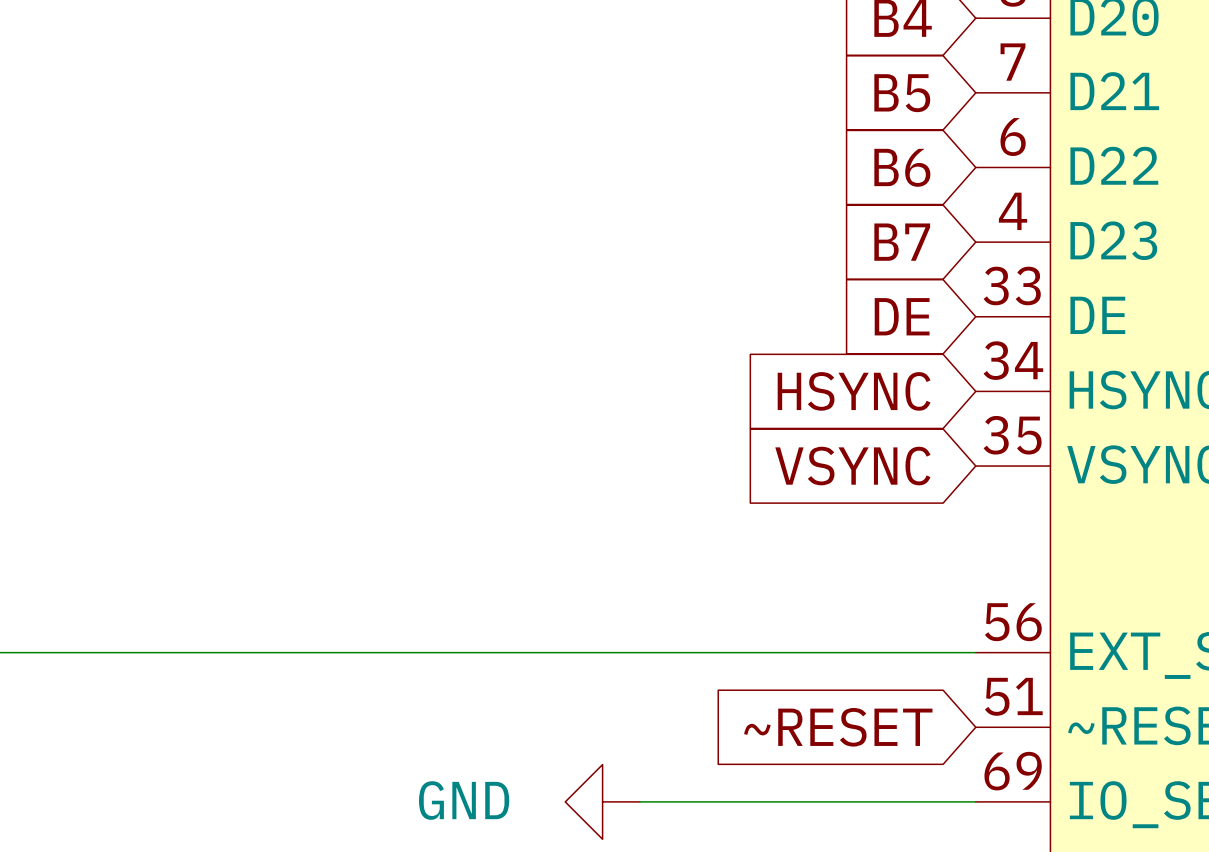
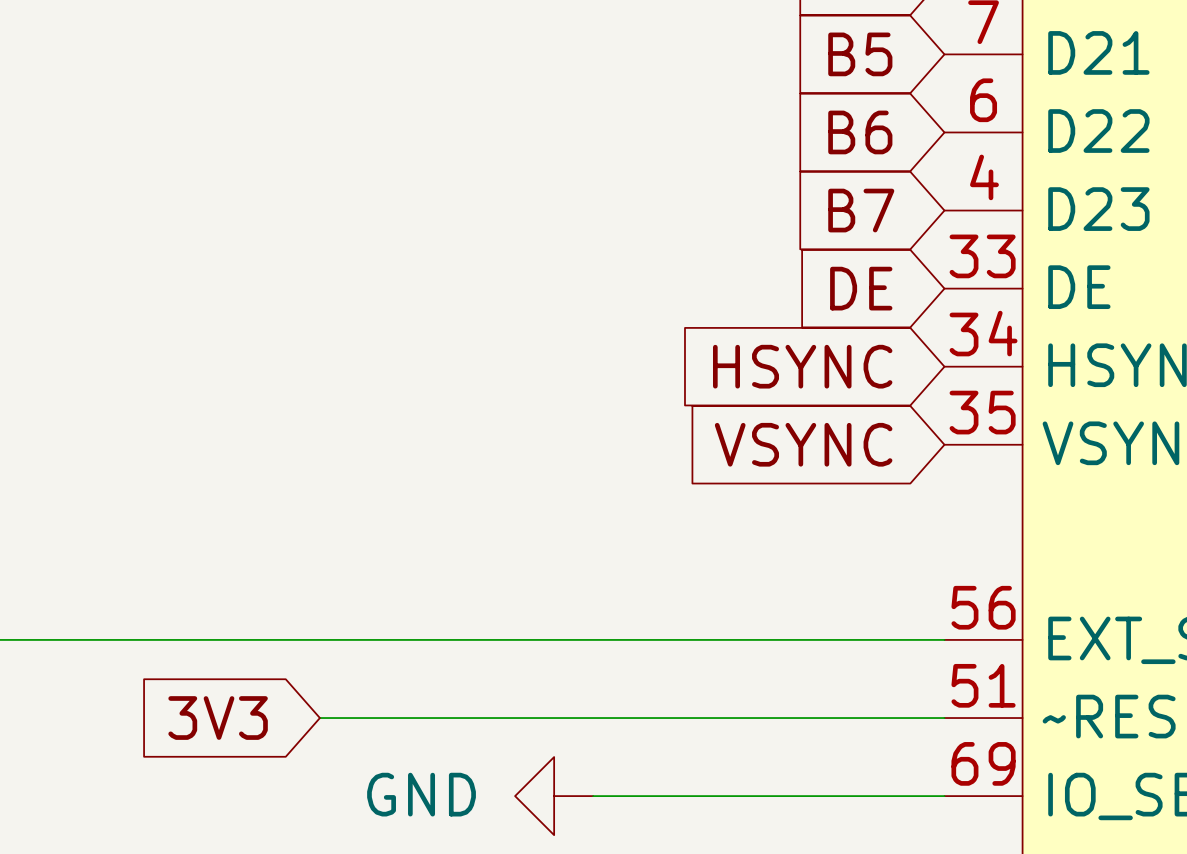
global label: none -> 3V3 (218, 718)
wire: none -> (319, 718) (944, 718)
global label: ~RESET (838, 727) -> none

